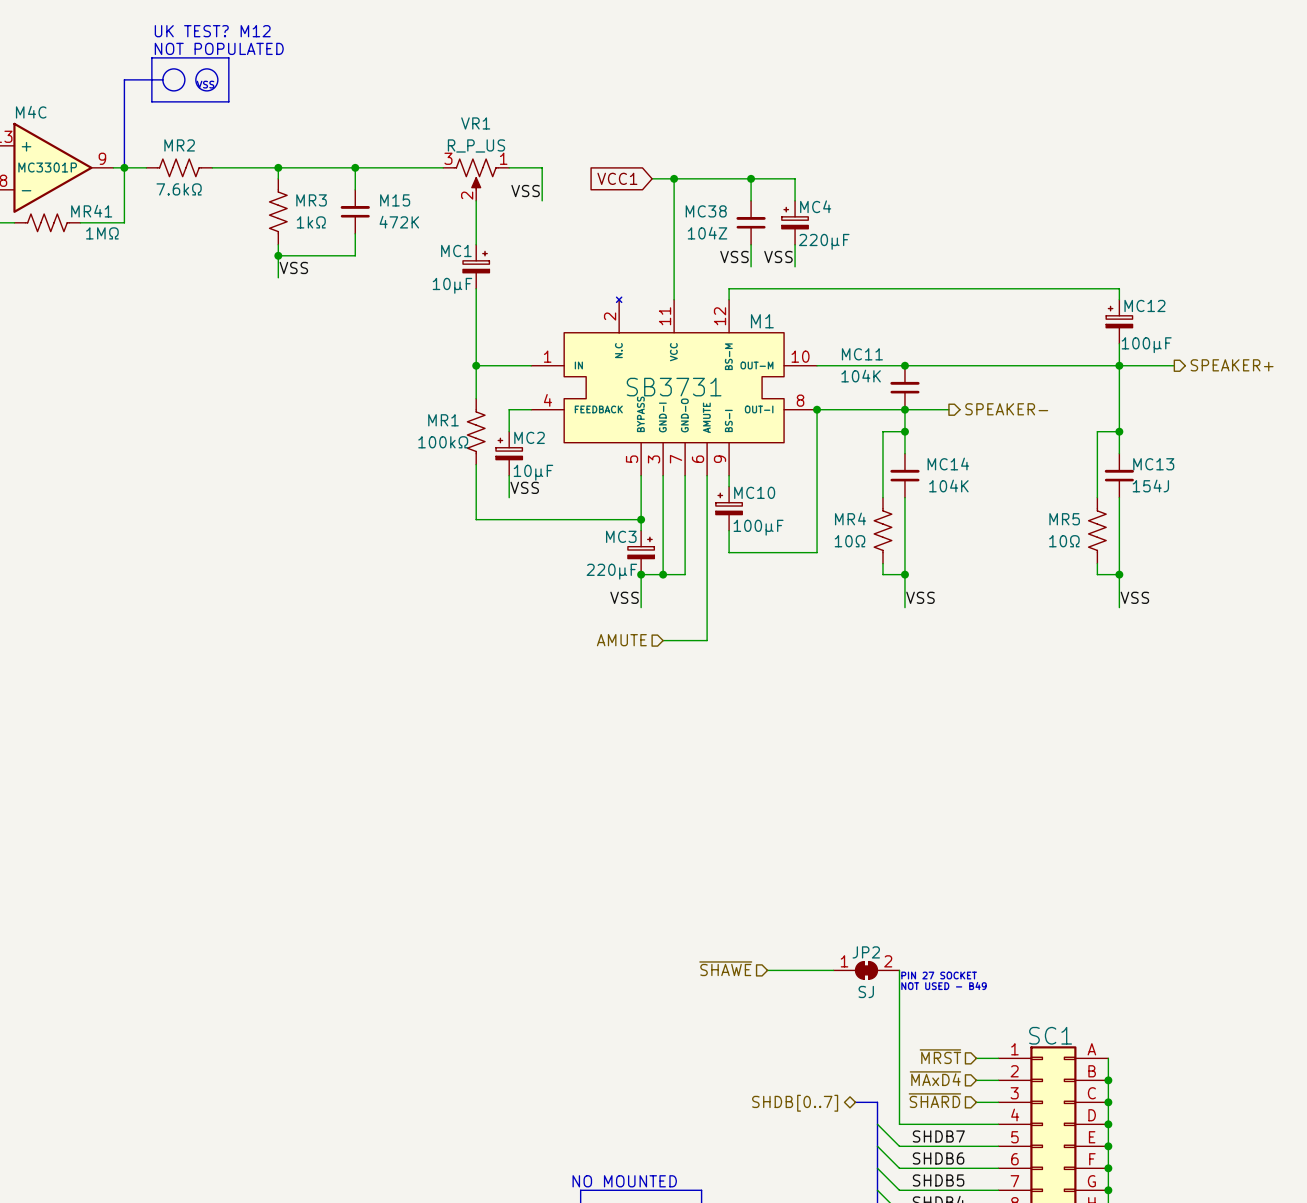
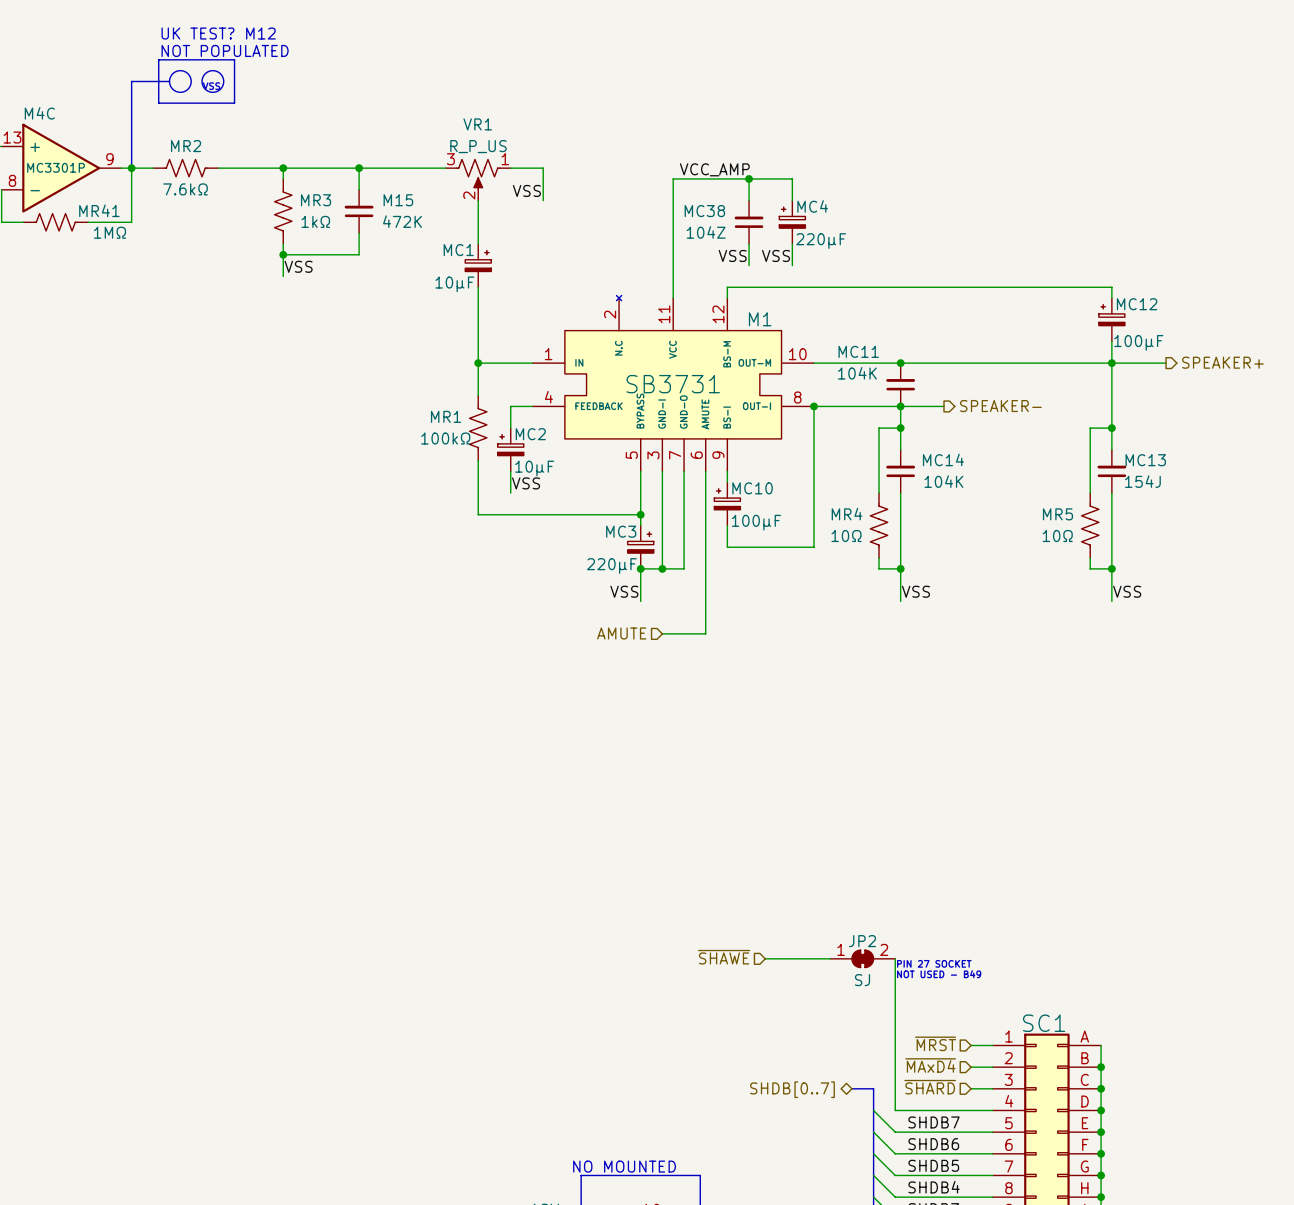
label: none -> VCC_AMP (714, 169)
global label: VCC1 (617, 178) -> none
wire: (652, 178) (674, 178) -> none
junction: (674, 178) -> none

